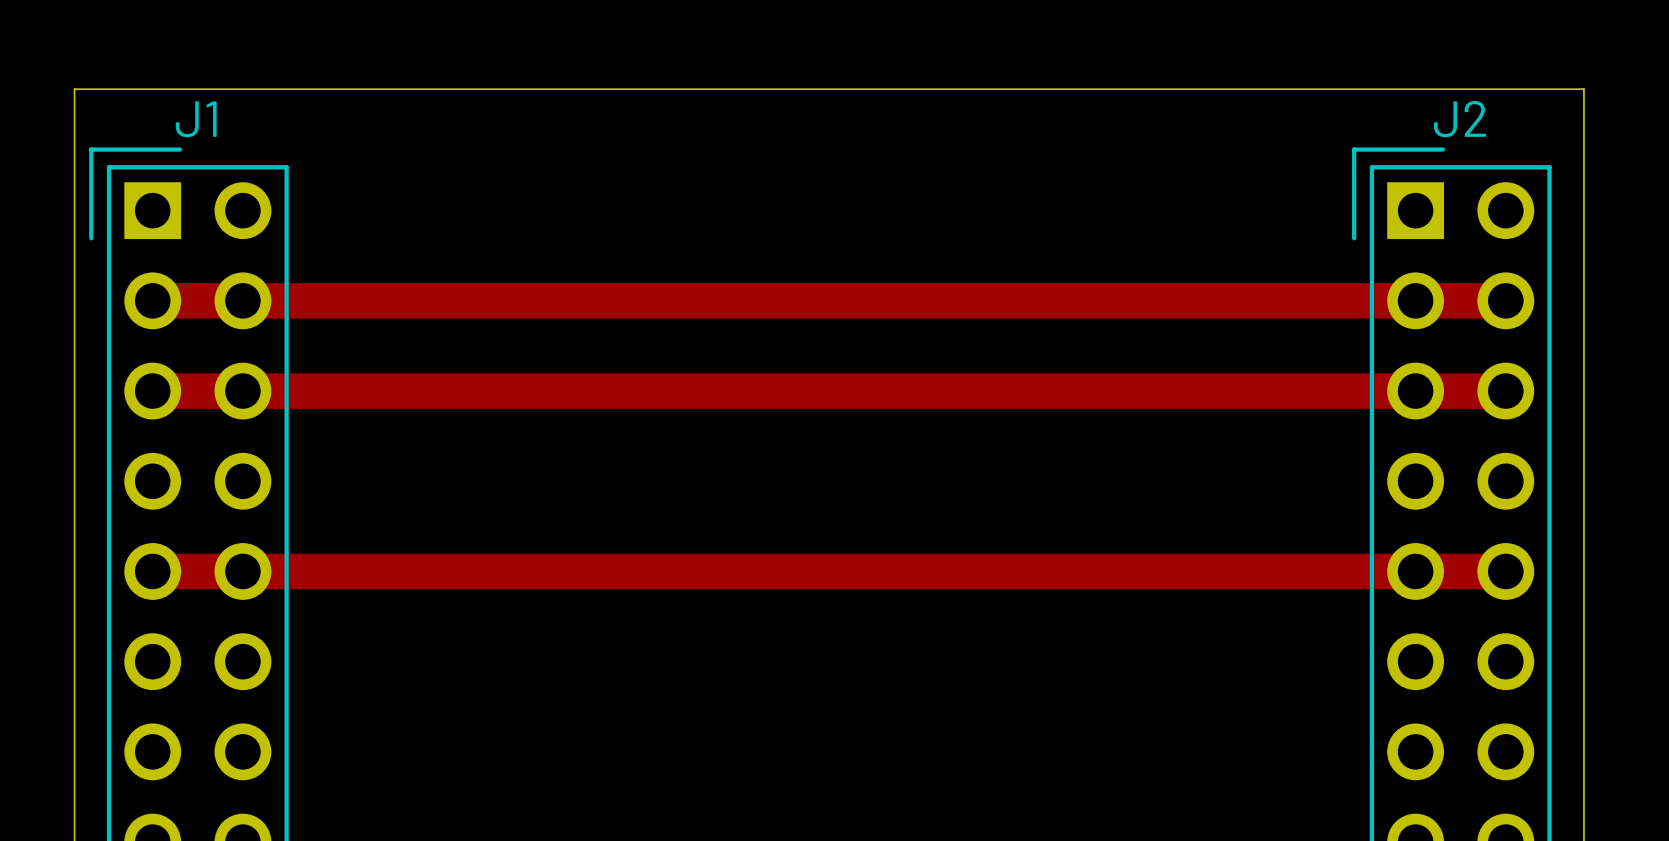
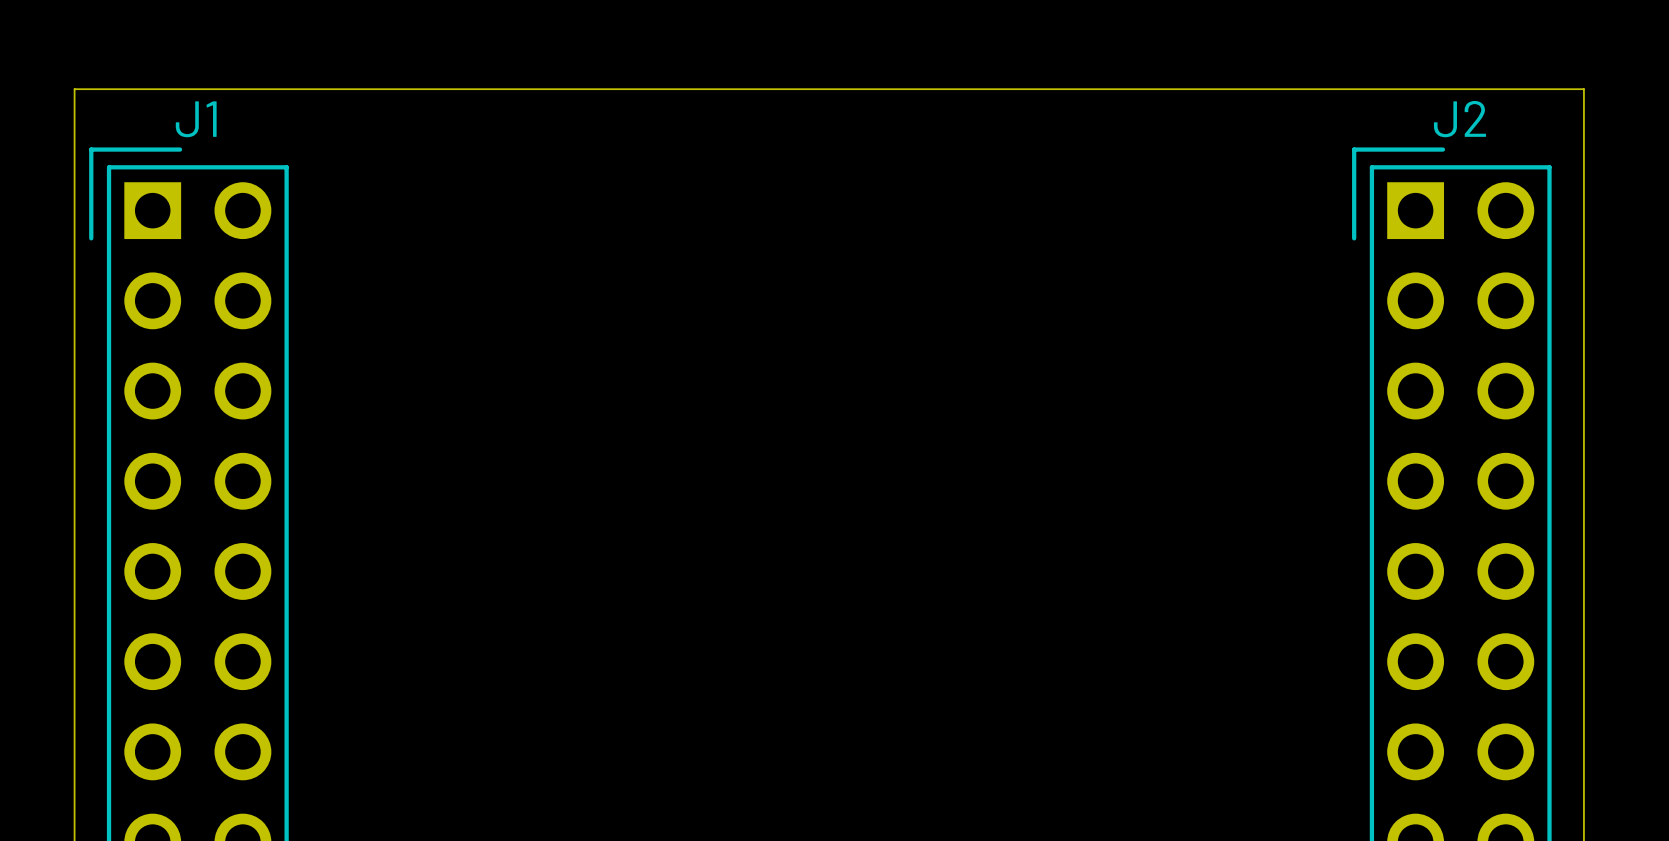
top track: (152, 300) (1505, 300) -> none
top track: (152, 391) (1505, 391) -> none
top track: (152, 571) (1505, 571) -> none

